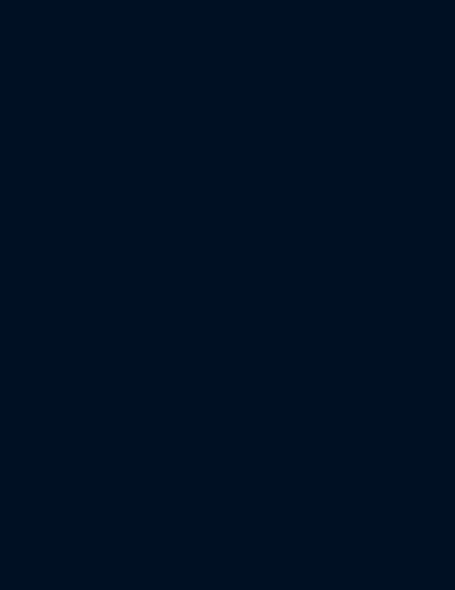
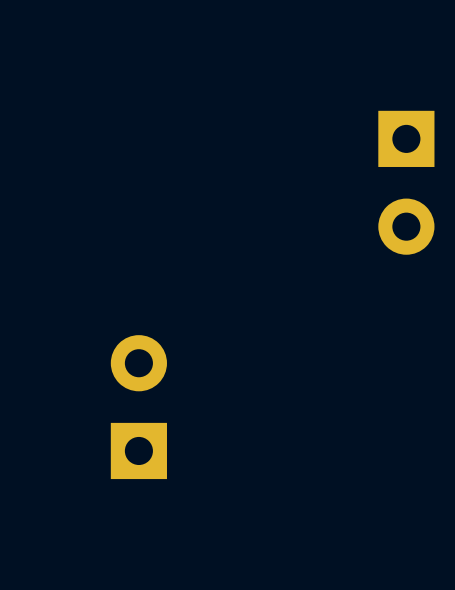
part: none -> (406, 182)
part: none -> (138, 407)

